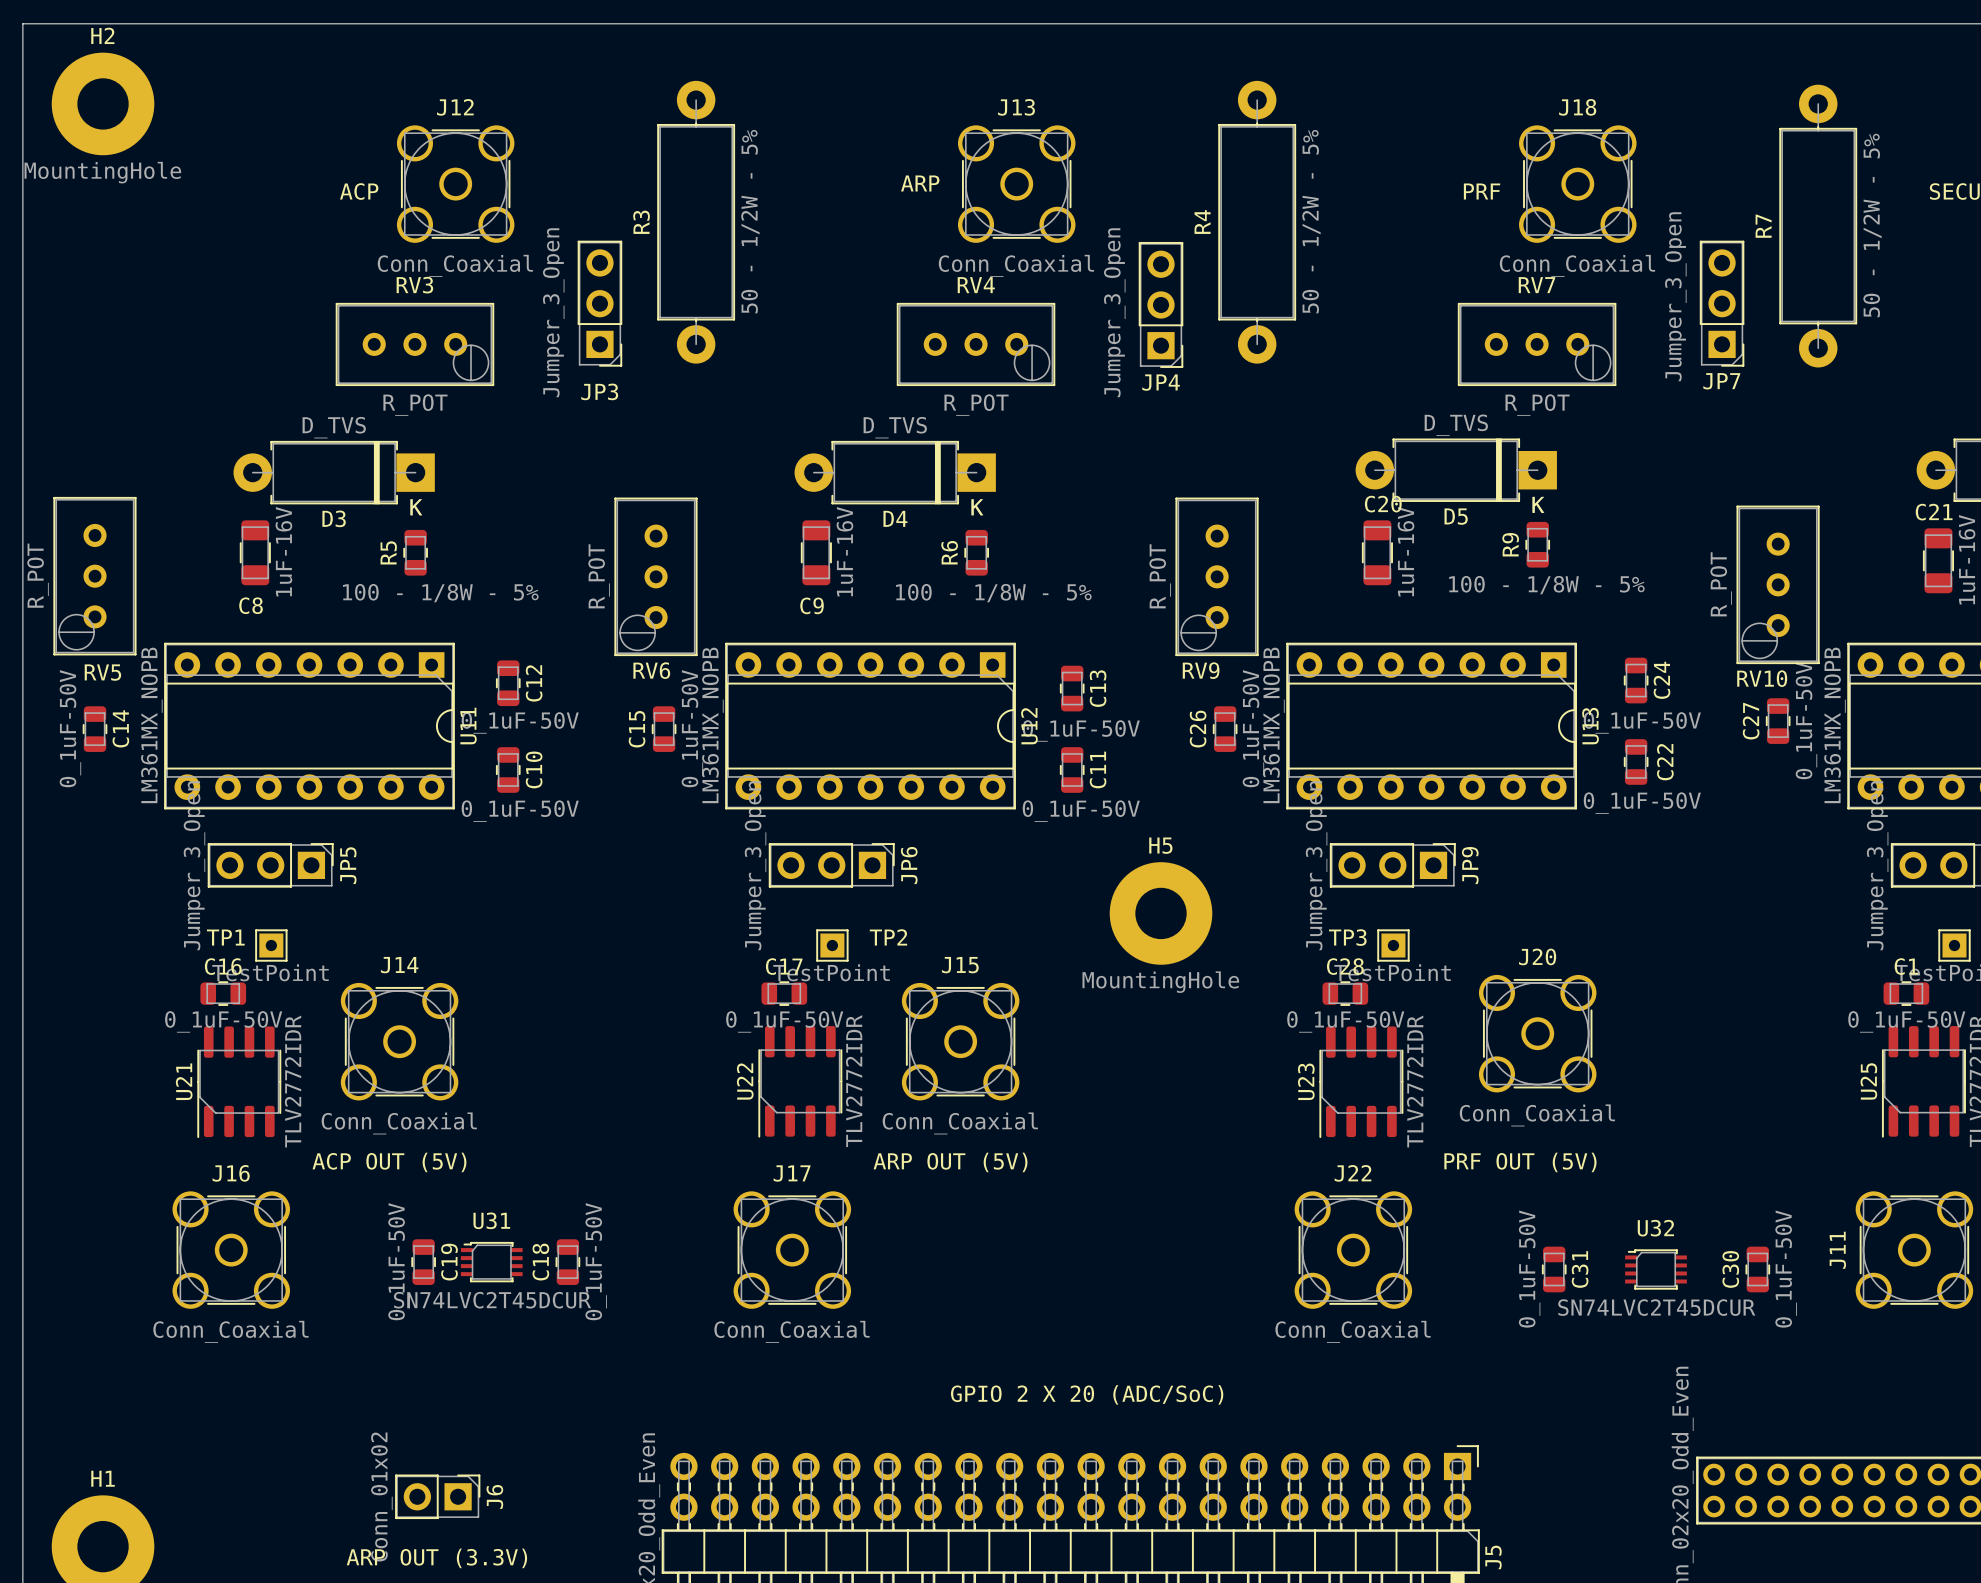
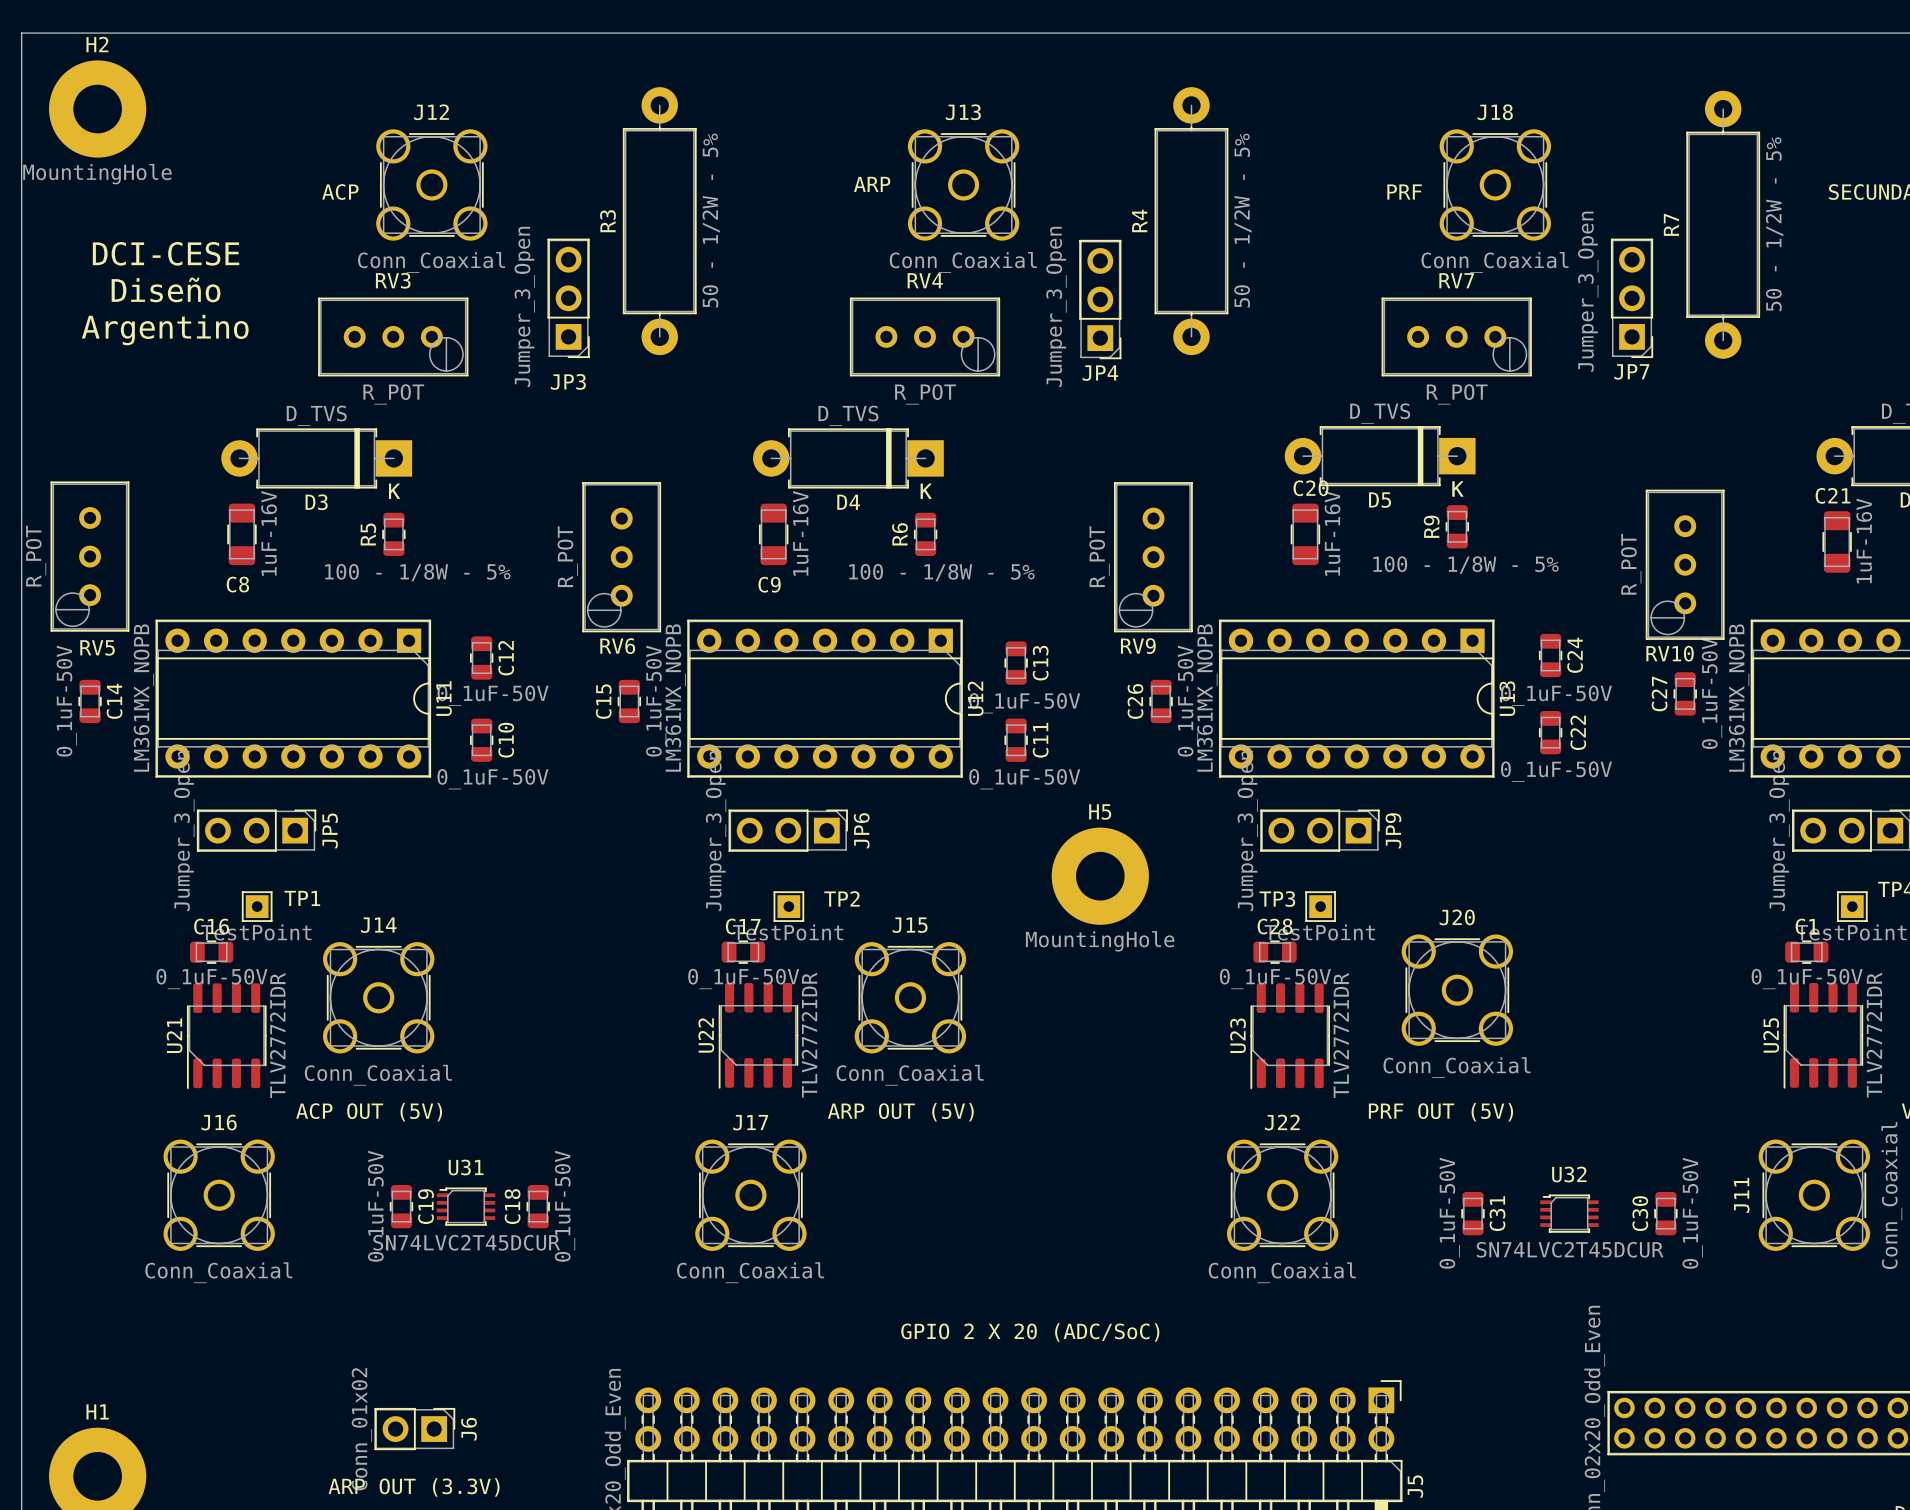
text: none -> DCI-CESE (166, 253)
text: none -> Diseño (166, 289)
text: none -> Argentino (165, 330)
TP1 name position: TP1 (225, 937) -> TP1 (302, 898)

